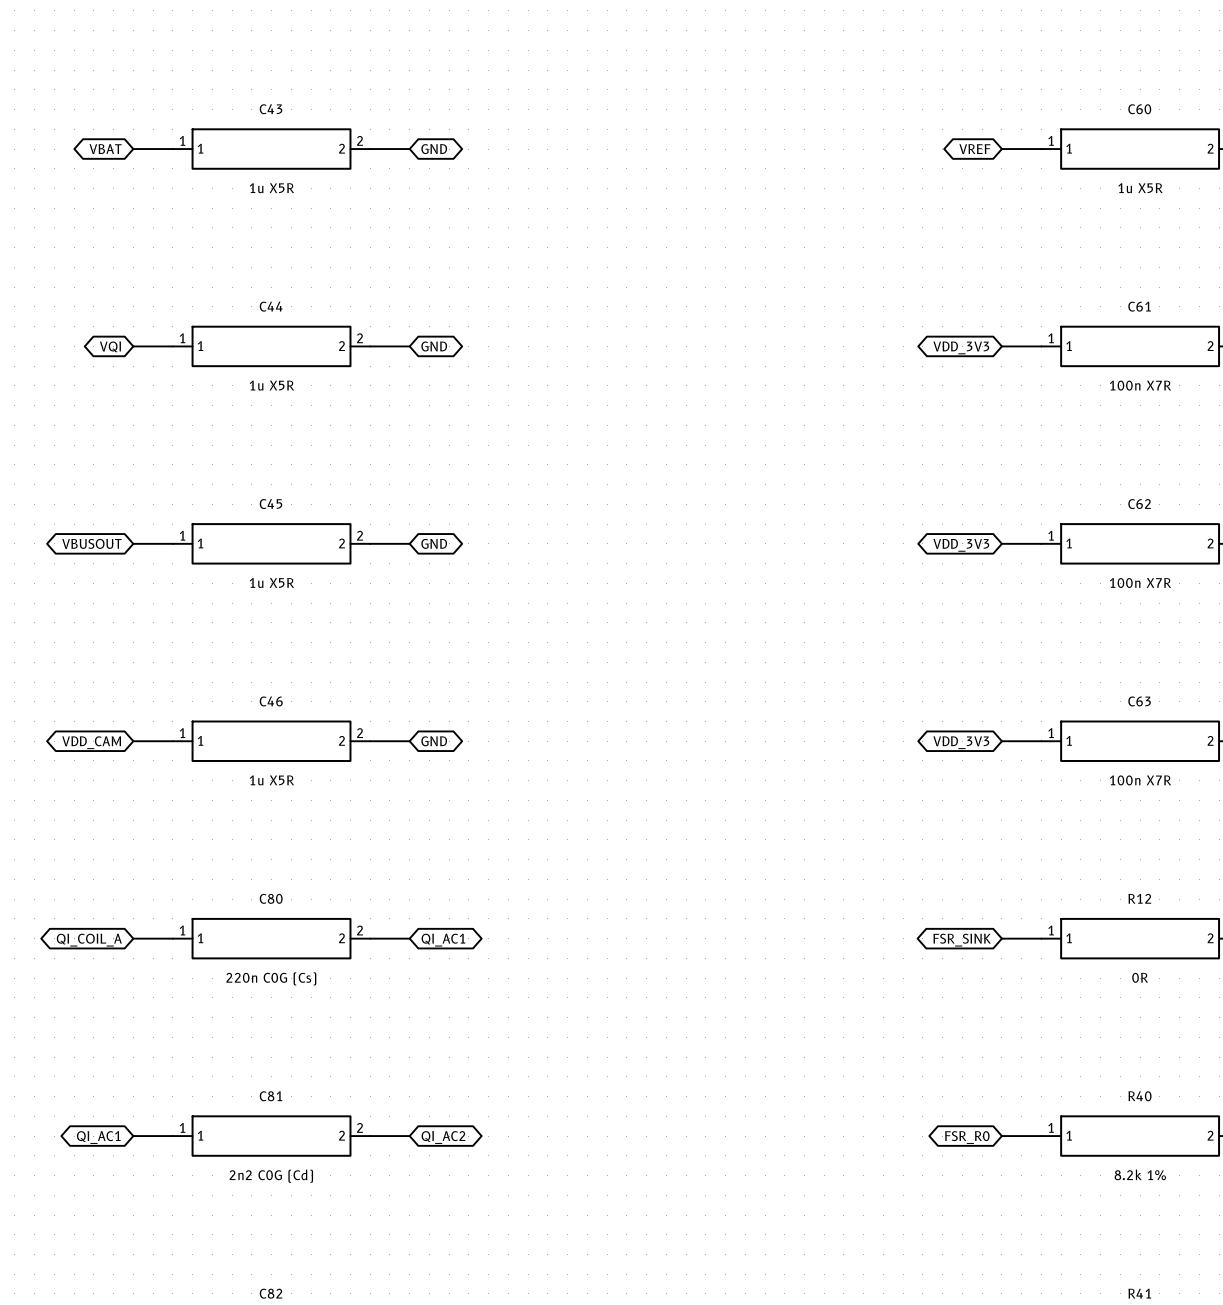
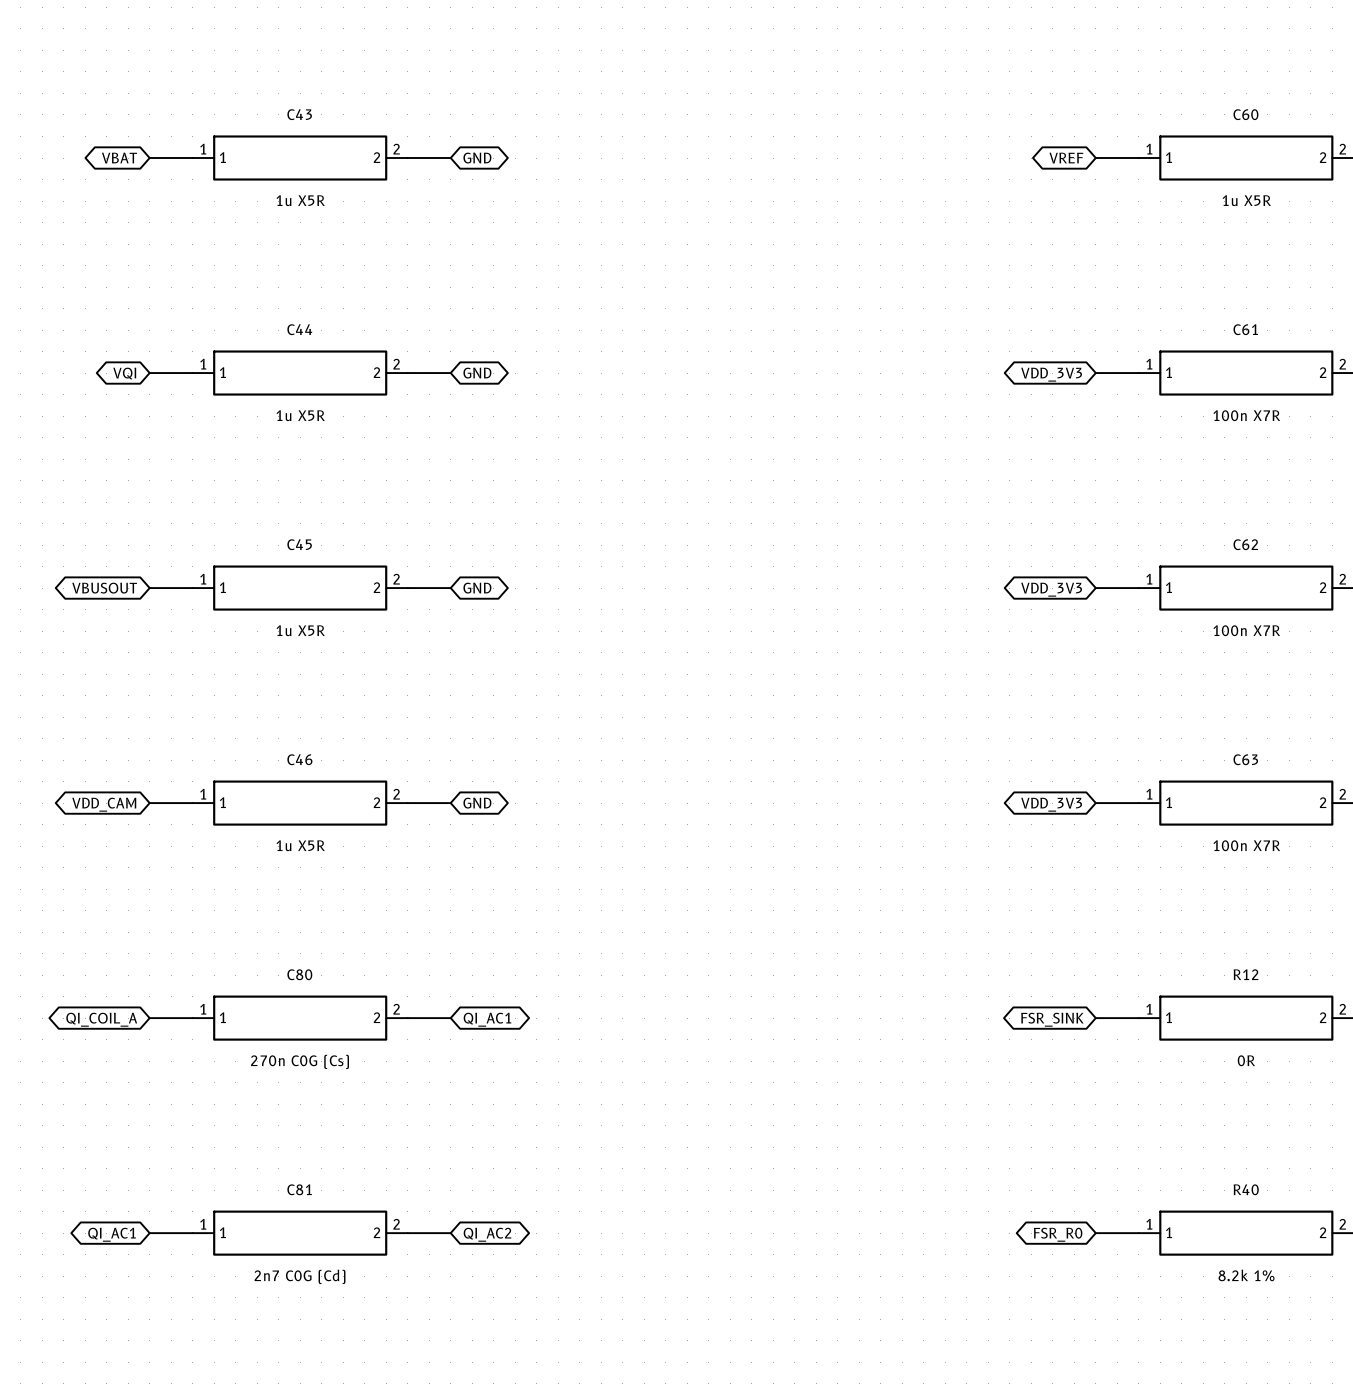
C80 value: 220n C0G (Cs) (271, 978) -> 270n C0G (Cs) (300, 1061)
C81 value: 2n2 C0G (Cd) (271, 1176) -> 2n7 C0G (Cd) (300, 1276)

